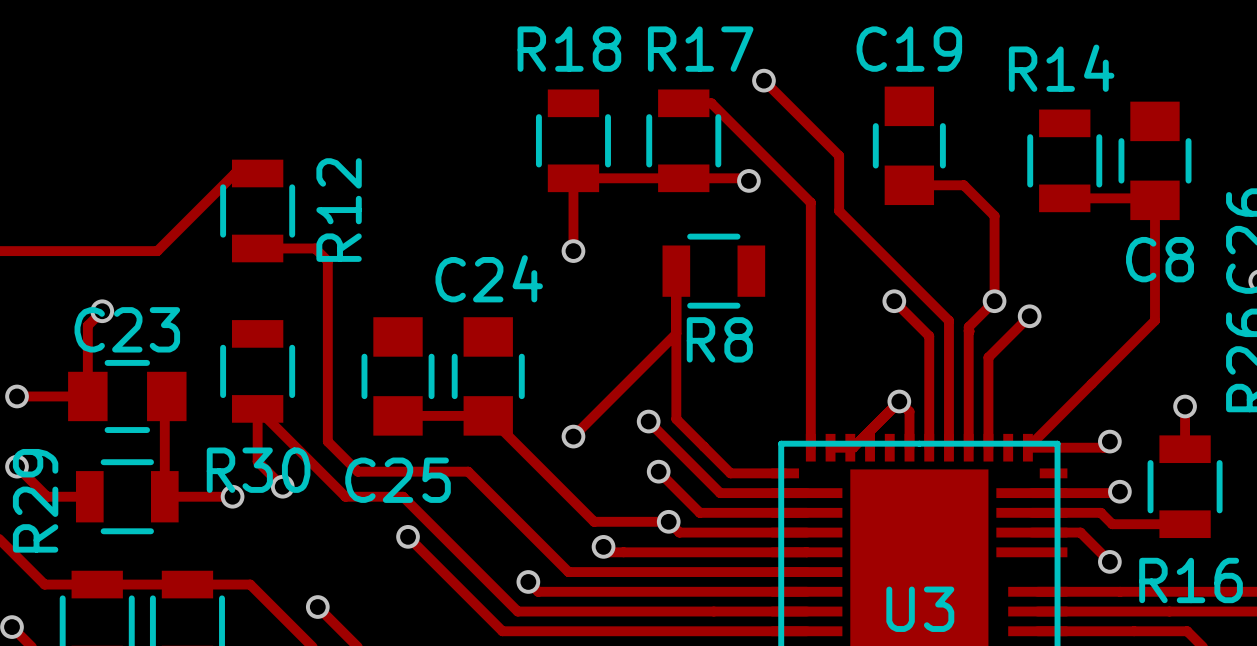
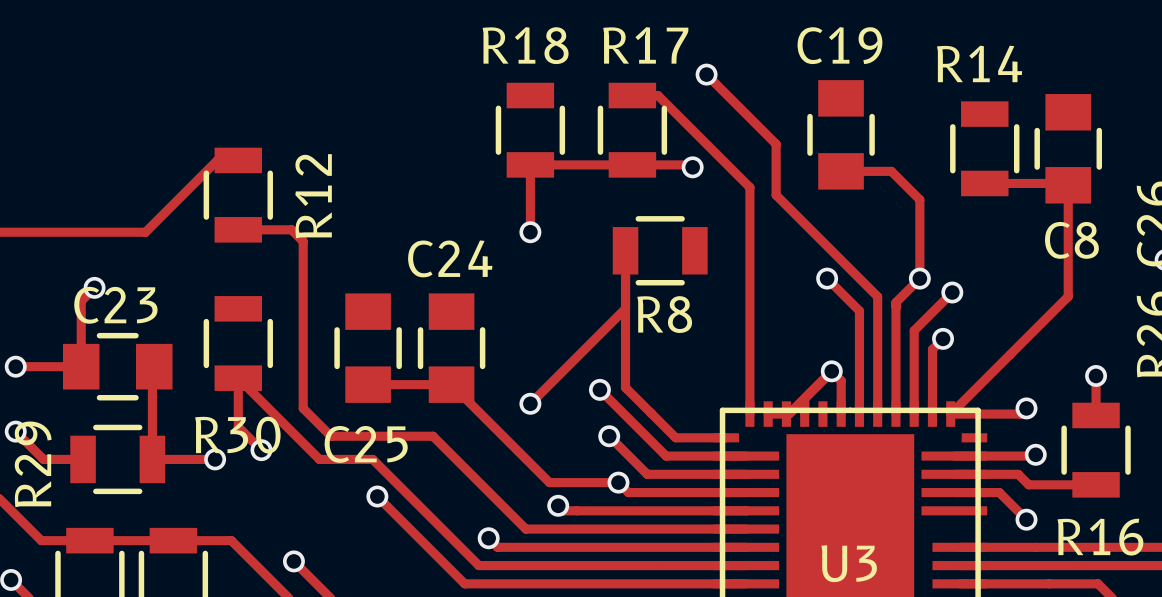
track: none -> (943, 338) (932, 349) (932, 414)
via: none -> (943, 338)

